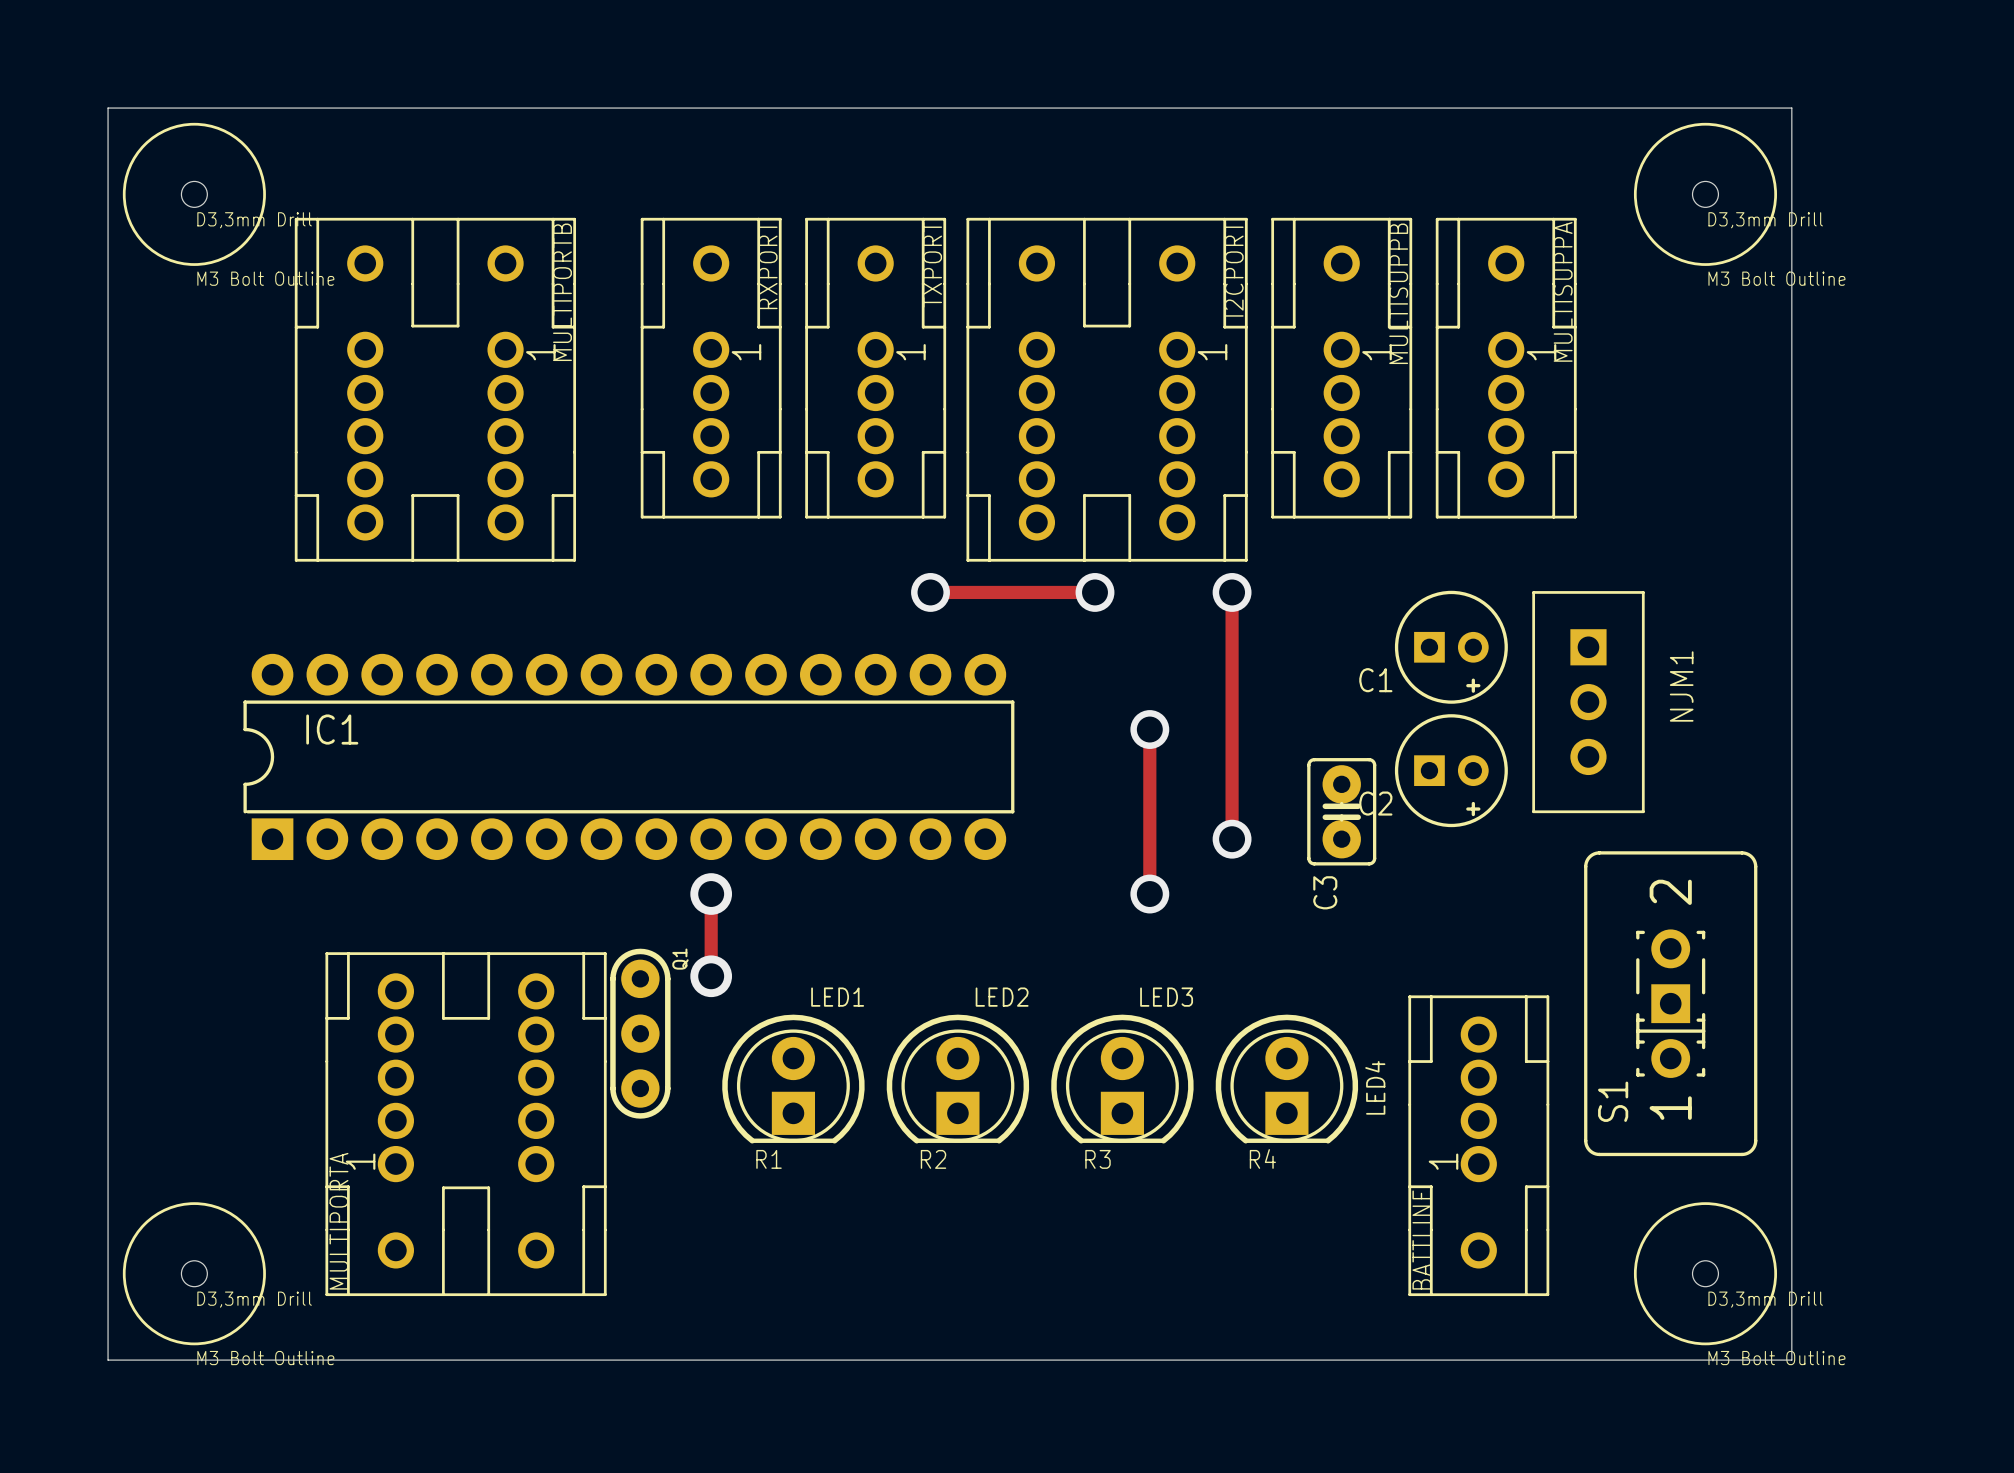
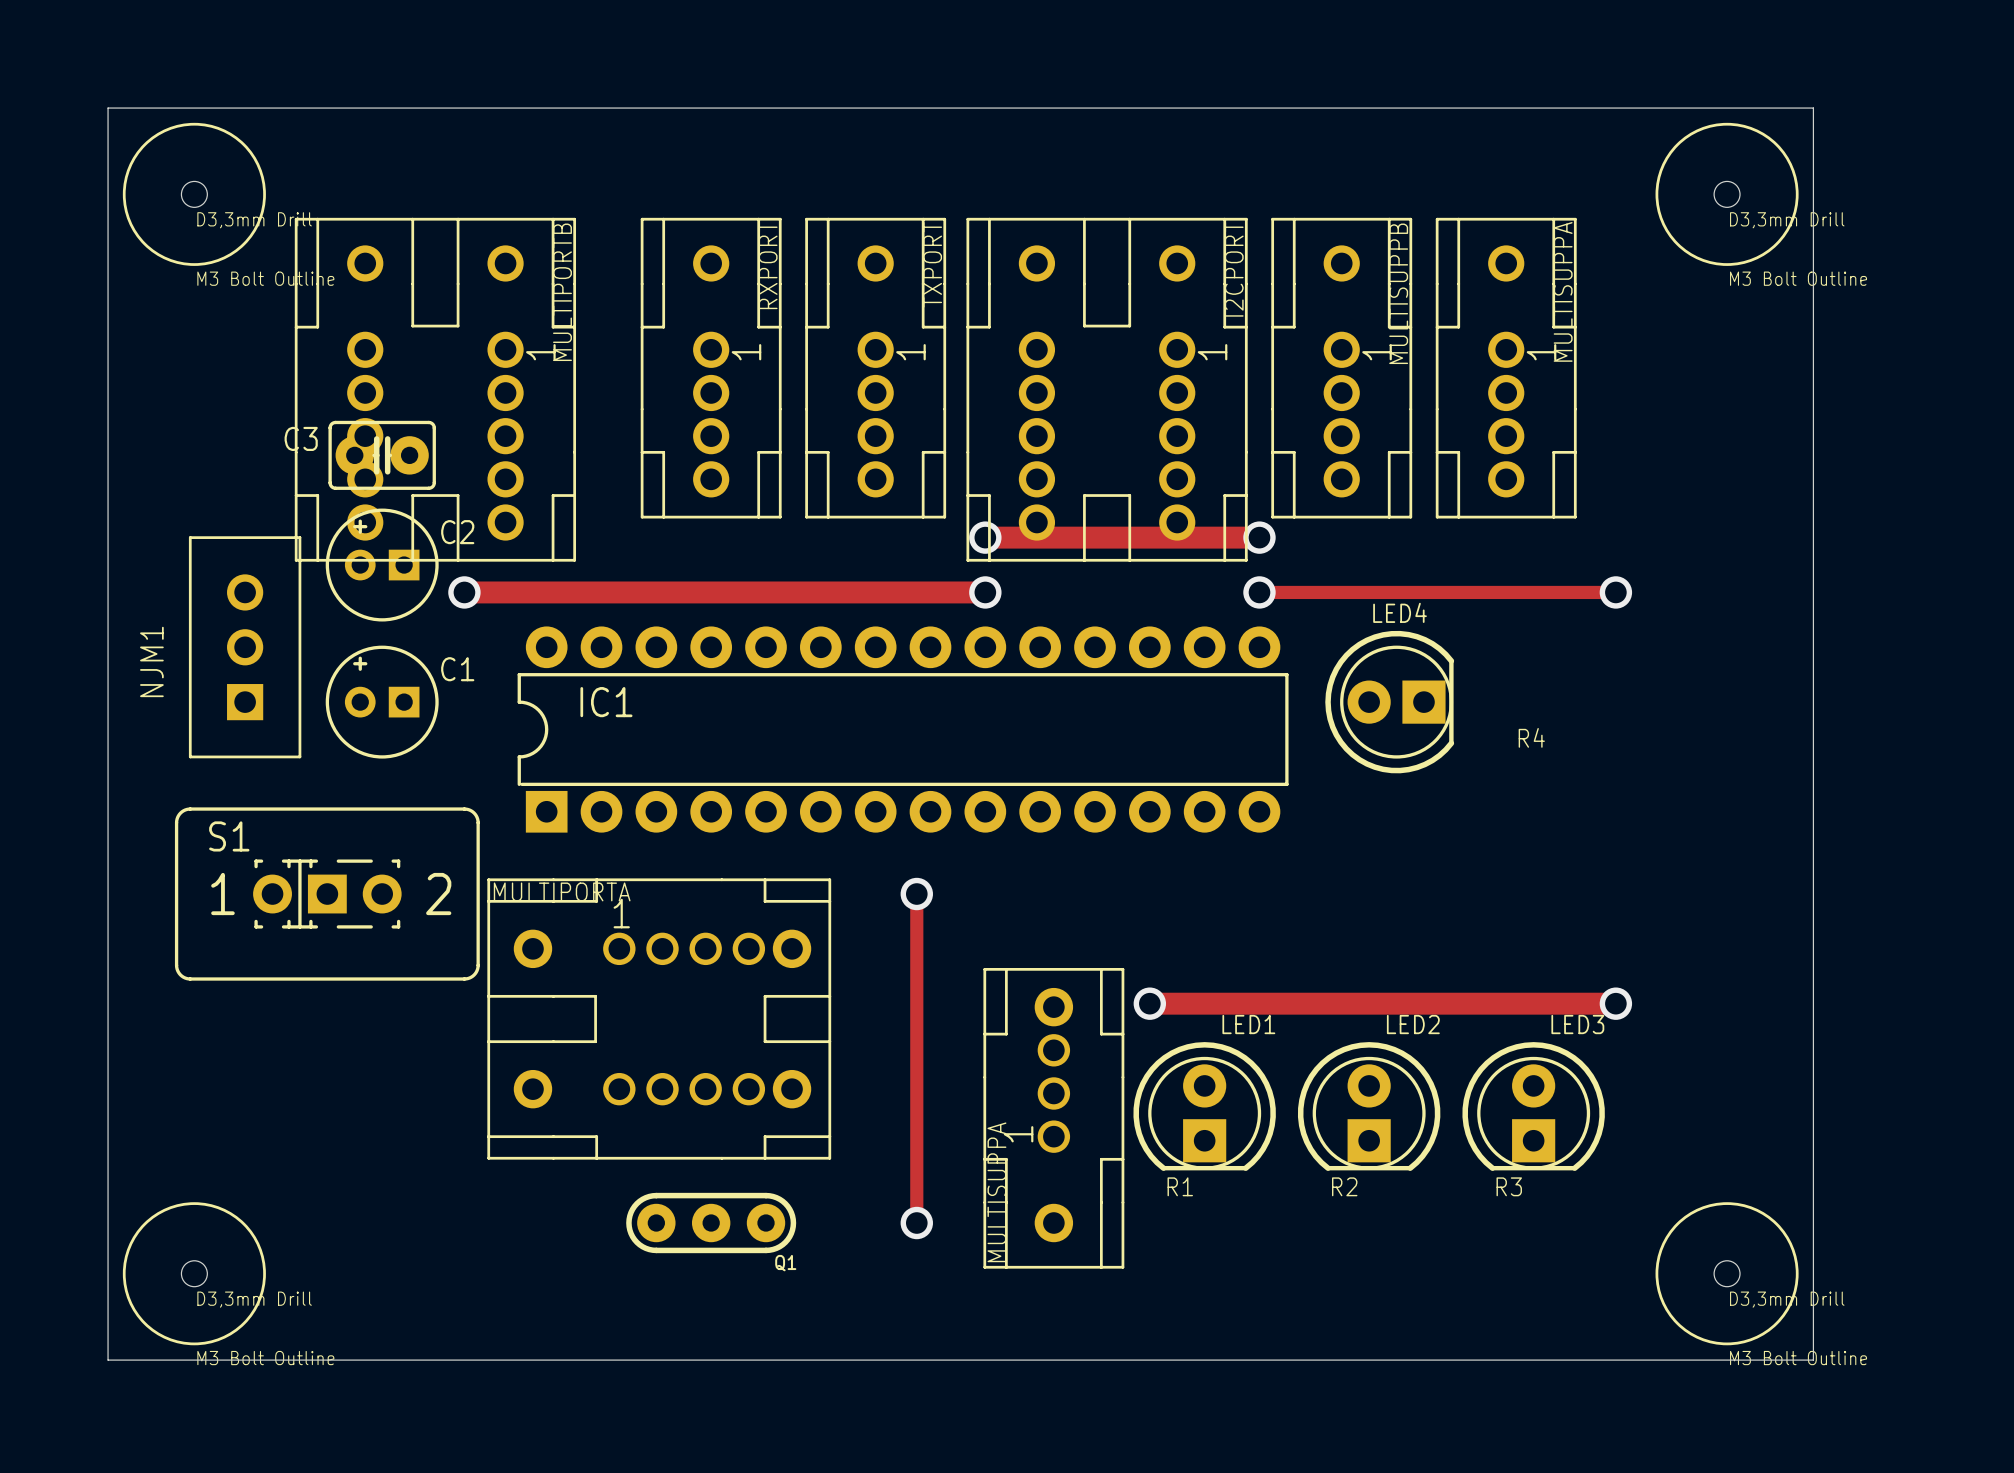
board edge: (1791, 108) (1791, 1360) -> (1791, 108) (1813, 108) (1813, 1360) (1791, 1360)
part position: (1705, 194) -> (1727, 194)
track: none -> (985, 537) (1259, 537)
via: none -> (985, 537)
via: none -> (1259, 537)
track: none -> (464, 592) (930, 592)
via: none -> (464, 592)
track width: thin (930, 592) (985, 592) -> thick (930, 592) (985, 592)
via: (930, 592) -> none
track: (985, 592) (1094, 592) -> none
via: none -> (985, 592)
via: (1094, 592) -> none
track: (1232, 592) (1232, 839) -> none
via: (1232, 592) -> none
track: none -> (1259, 592) (1615, 592)
via: none -> (1259, 592)
via: none -> (1615, 592)
C1 rotation: 0° (1451, 647) -> 180° (382, 702)
C1 position: (1451, 647) -> (382, 702)
NJM1 rotation: 0° (1588, 702) -> 180° (245, 647)
NJM1 position: (1588, 702) -> (245, 647)
track: (1149, 729) (1149, 894) -> none
via: (1149, 729) -> none
IC1 position: (628, 756) -> (903, 729)
C2 rotation: 0° (1451, 770) -> 180° (382, 565)
C2 position: (1451, 770) -> (382, 565)
C3 rotation: 0° (1341, 811) -> 90° clockwise (382, 455)
C3 position: (1341, 811) -> (382, 455)
via: (1232, 839) -> none
track: (711, 894) (711, 976) -> none
via: (711, 894) -> none
track: none -> (916, 894) (916, 1223)
via: none -> (916, 894)
via: (1149, 894) -> none
via: (711, 976) -> none
track: none -> (1149, 1003) (1615, 1003)
via: none -> (1149, 1003)
via: none -> (1615, 1003)
S1 rotation: 0° (1670, 1003) -> 90° clockwise (327, 894)
S1 position: (1670, 1003) -> (327, 894)
MULTIPORTA: none -> (659, 1019)
Q1 rotation: 0° (640, 1033) -> 90° clockwise (711, 1223)
Q1 position: (640, 1033) -> (711, 1223)
LED1 position: (793, 1079) -> (1204, 1106)
LED2 position: (957, 1079) -> (1369, 1106)
LED3 position: (1122, 1079) -> (1533, 1106)
LED4 rotation: 0° (1286, 1079) -> 90° counterclockwise (1389, 702)
LED4 position: (1286, 1079) -> (1389, 702)
MULTISUPPA: none -> (1053, 1118)
MULTIPORTA: (466, 1124) -> none
BATTLINE: (1478, 1145) -> none
R4 position: (1262, 1158) -> (1531, 737)
R1 position: (769, 1159) -> (1180, 1186)
R2 position: (933, 1159) -> (1344, 1186)
R3 position: (1098, 1159) -> (1509, 1186)
via: none -> (916, 1223)
part position: (1705, 1273) -> (1727, 1273)

